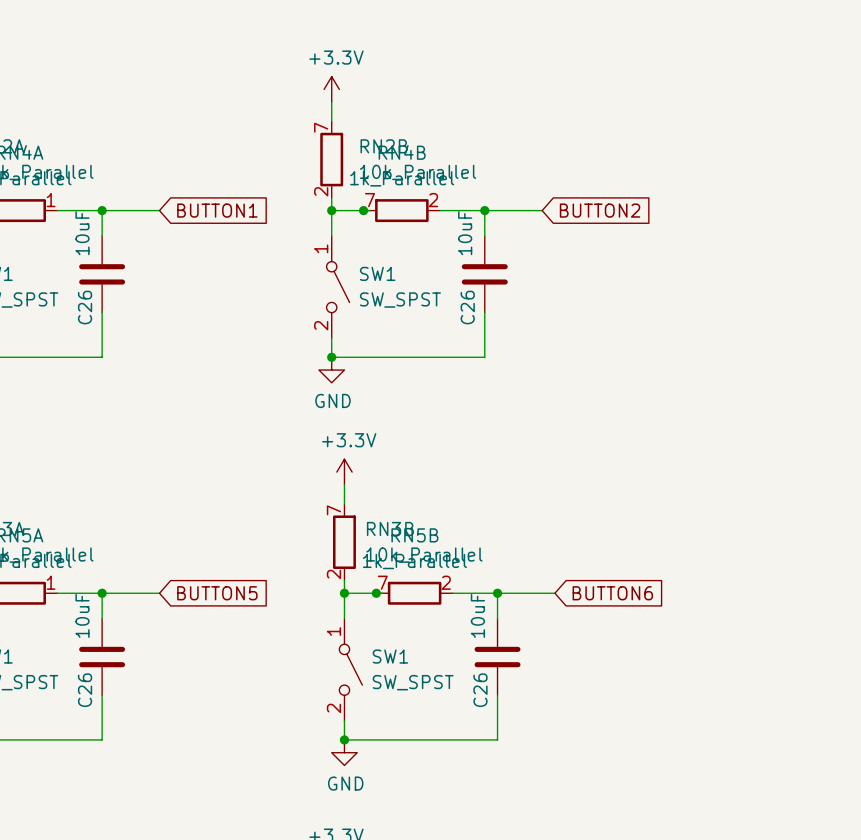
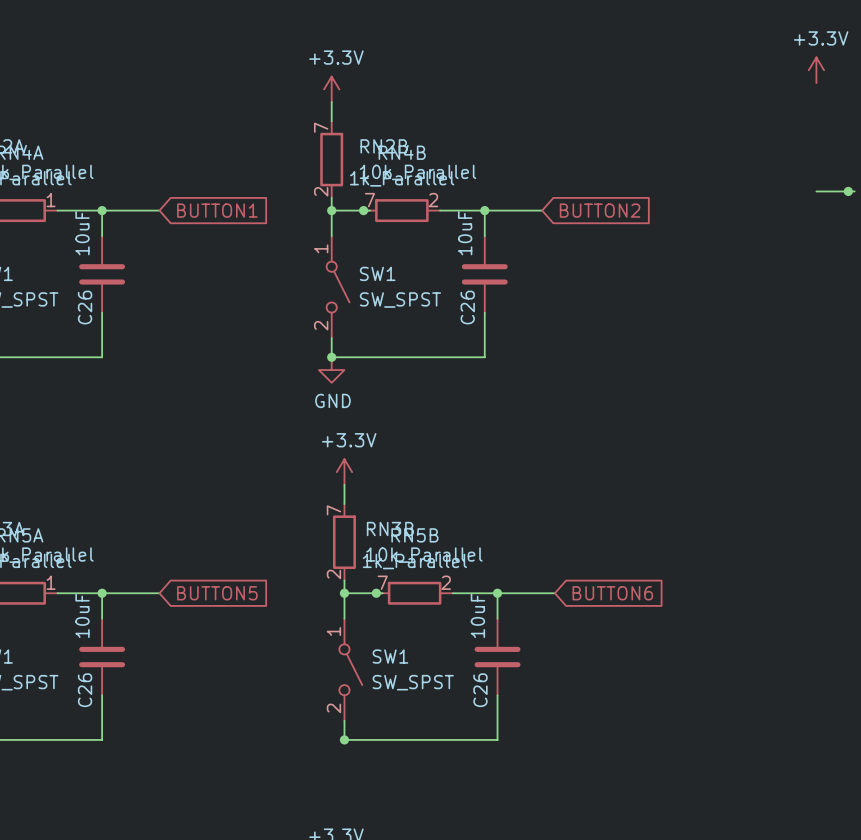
power symbol: none -> +3.3V (816, 70)
wire: none -> (816, 191) (854, 191)
junction: none -> (848, 191)
power symbol: GND (344, 752) -> none

